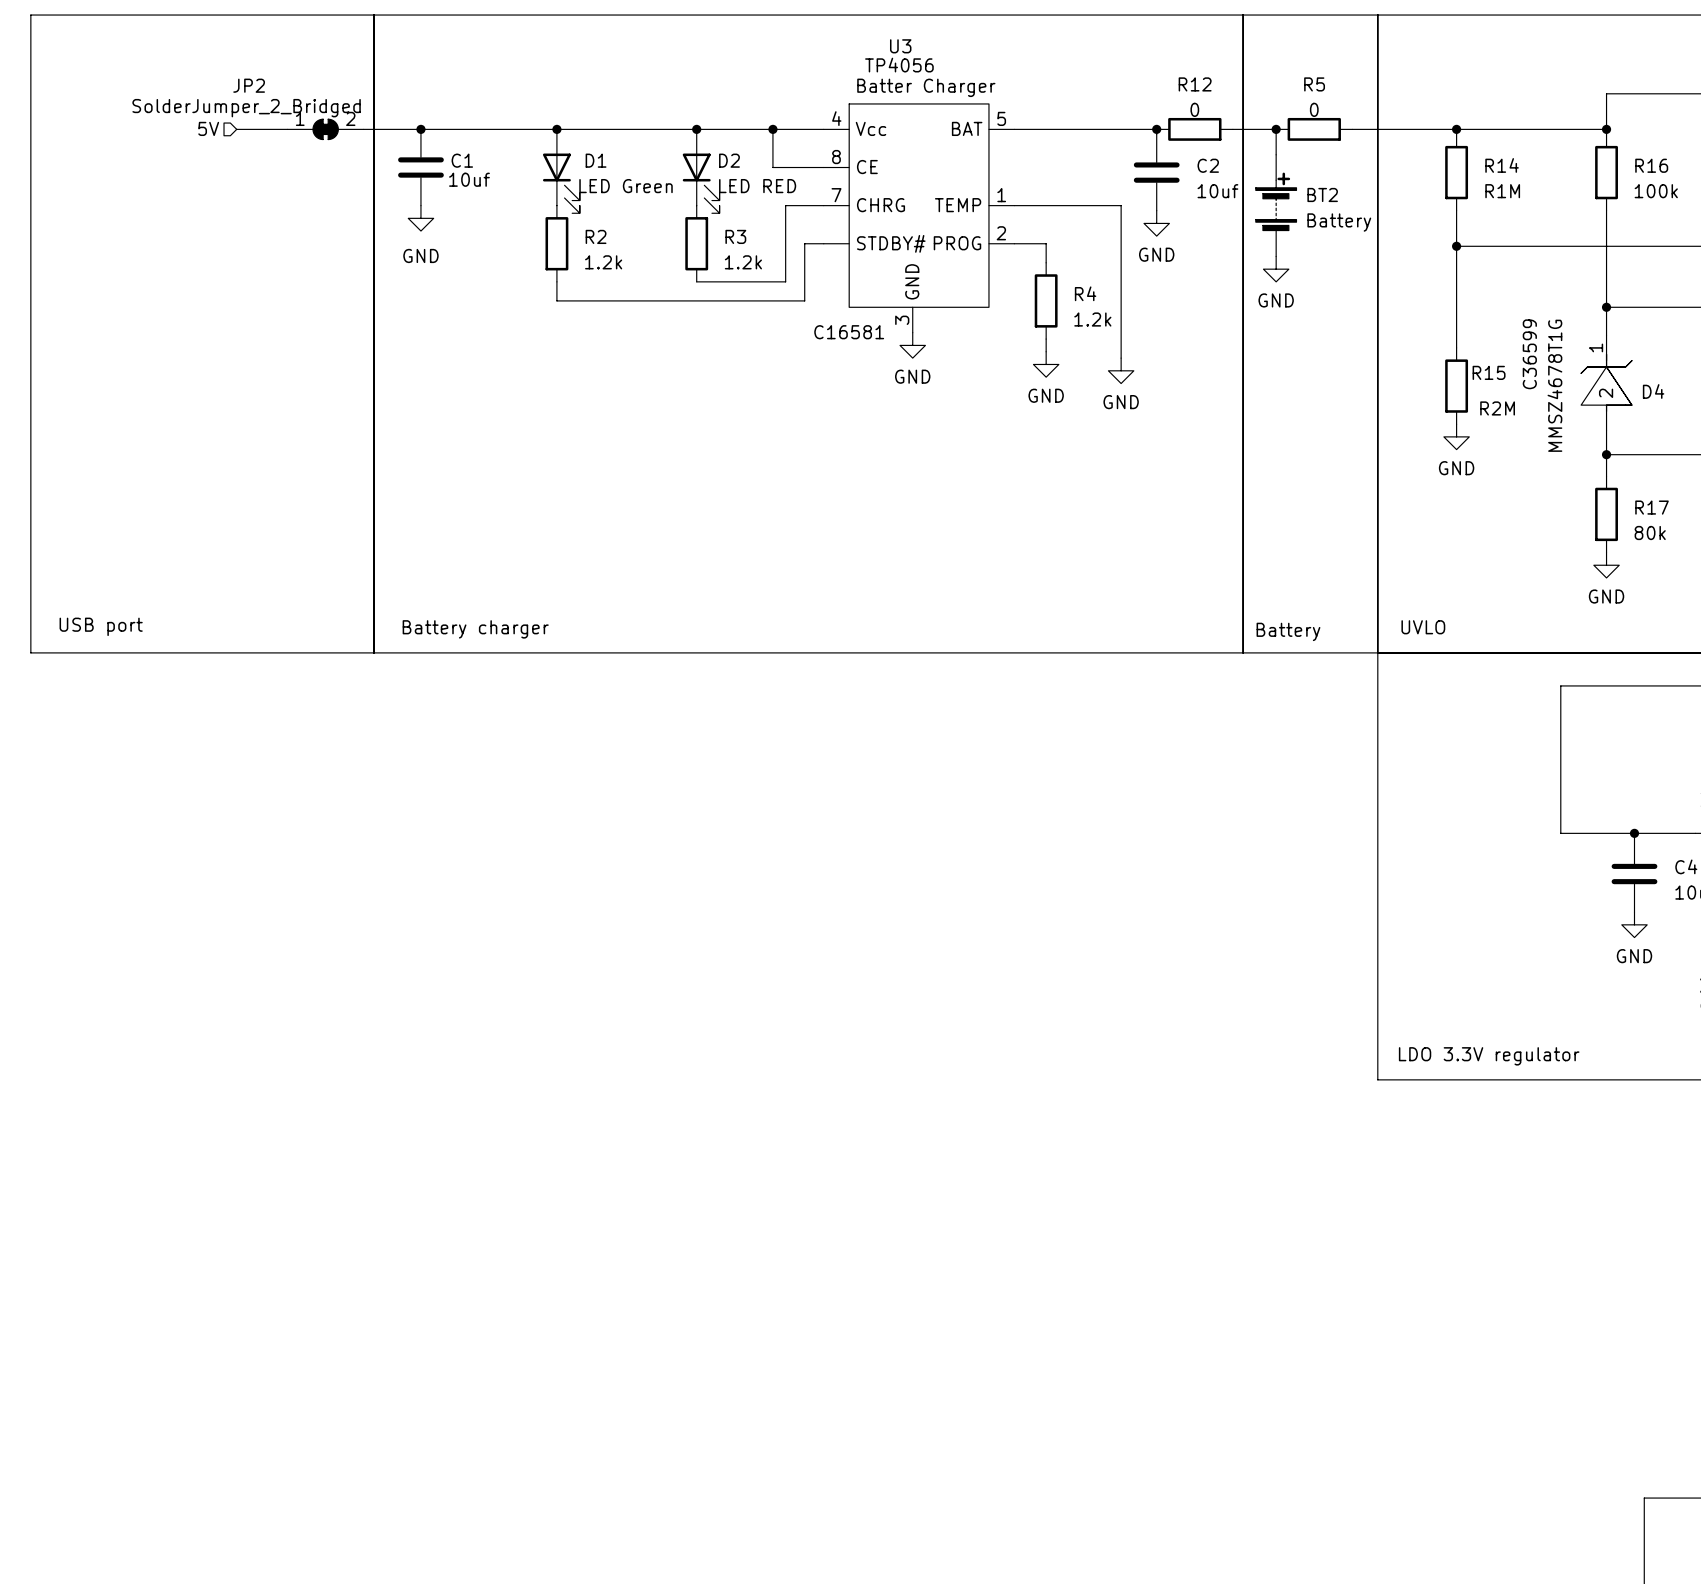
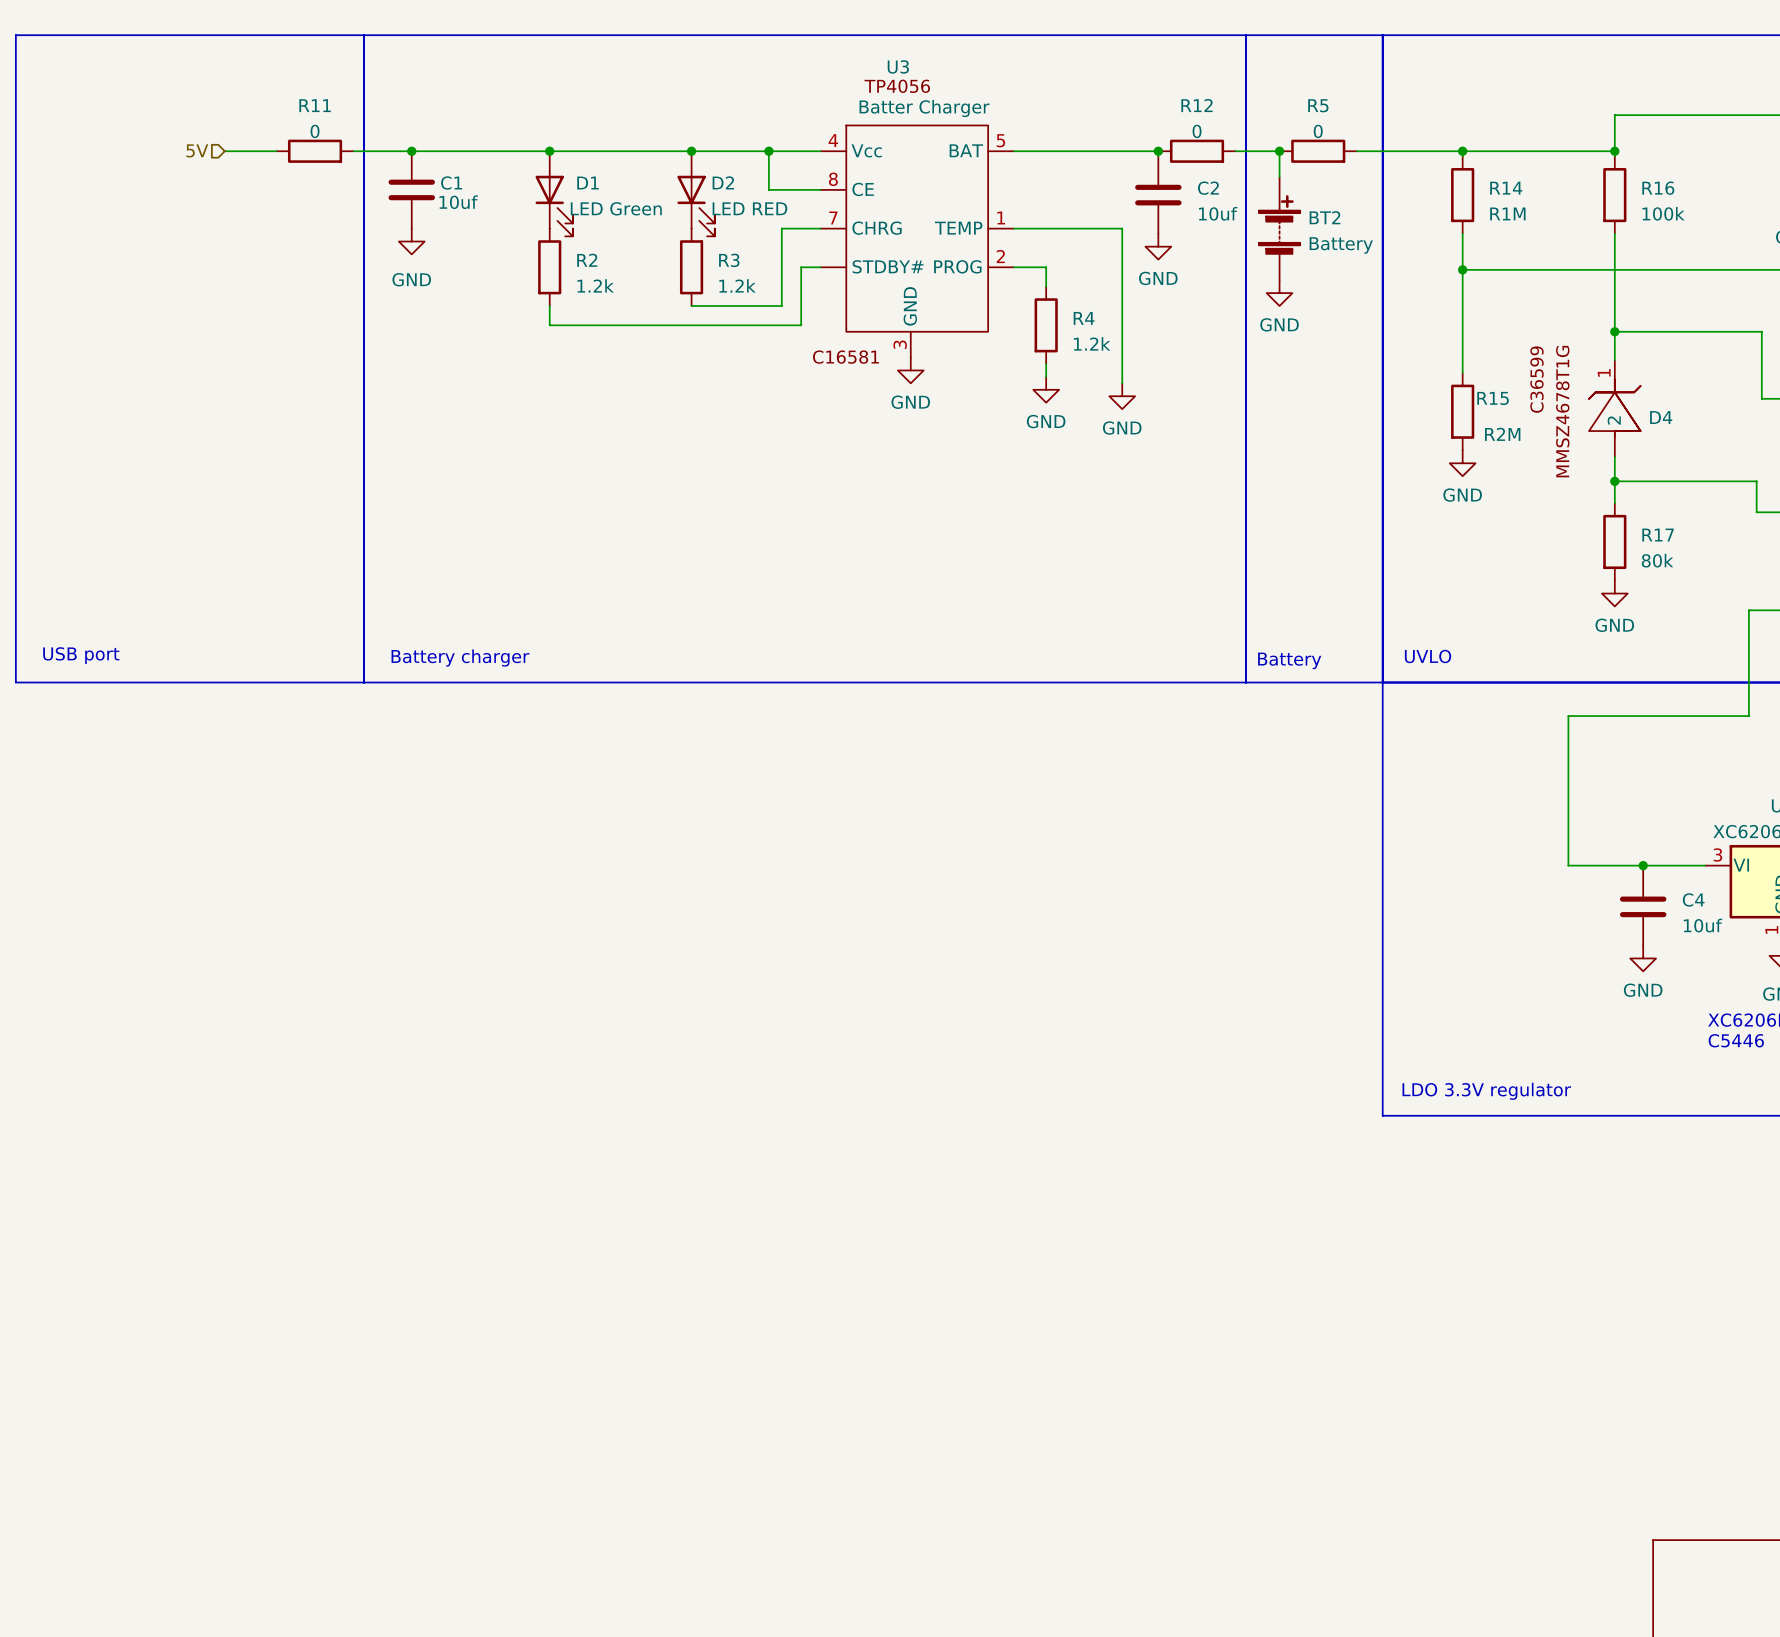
JP2: SolderJumper_2_Bridged (325, 129) -> none
R11: none -> 0 (315, 151)

